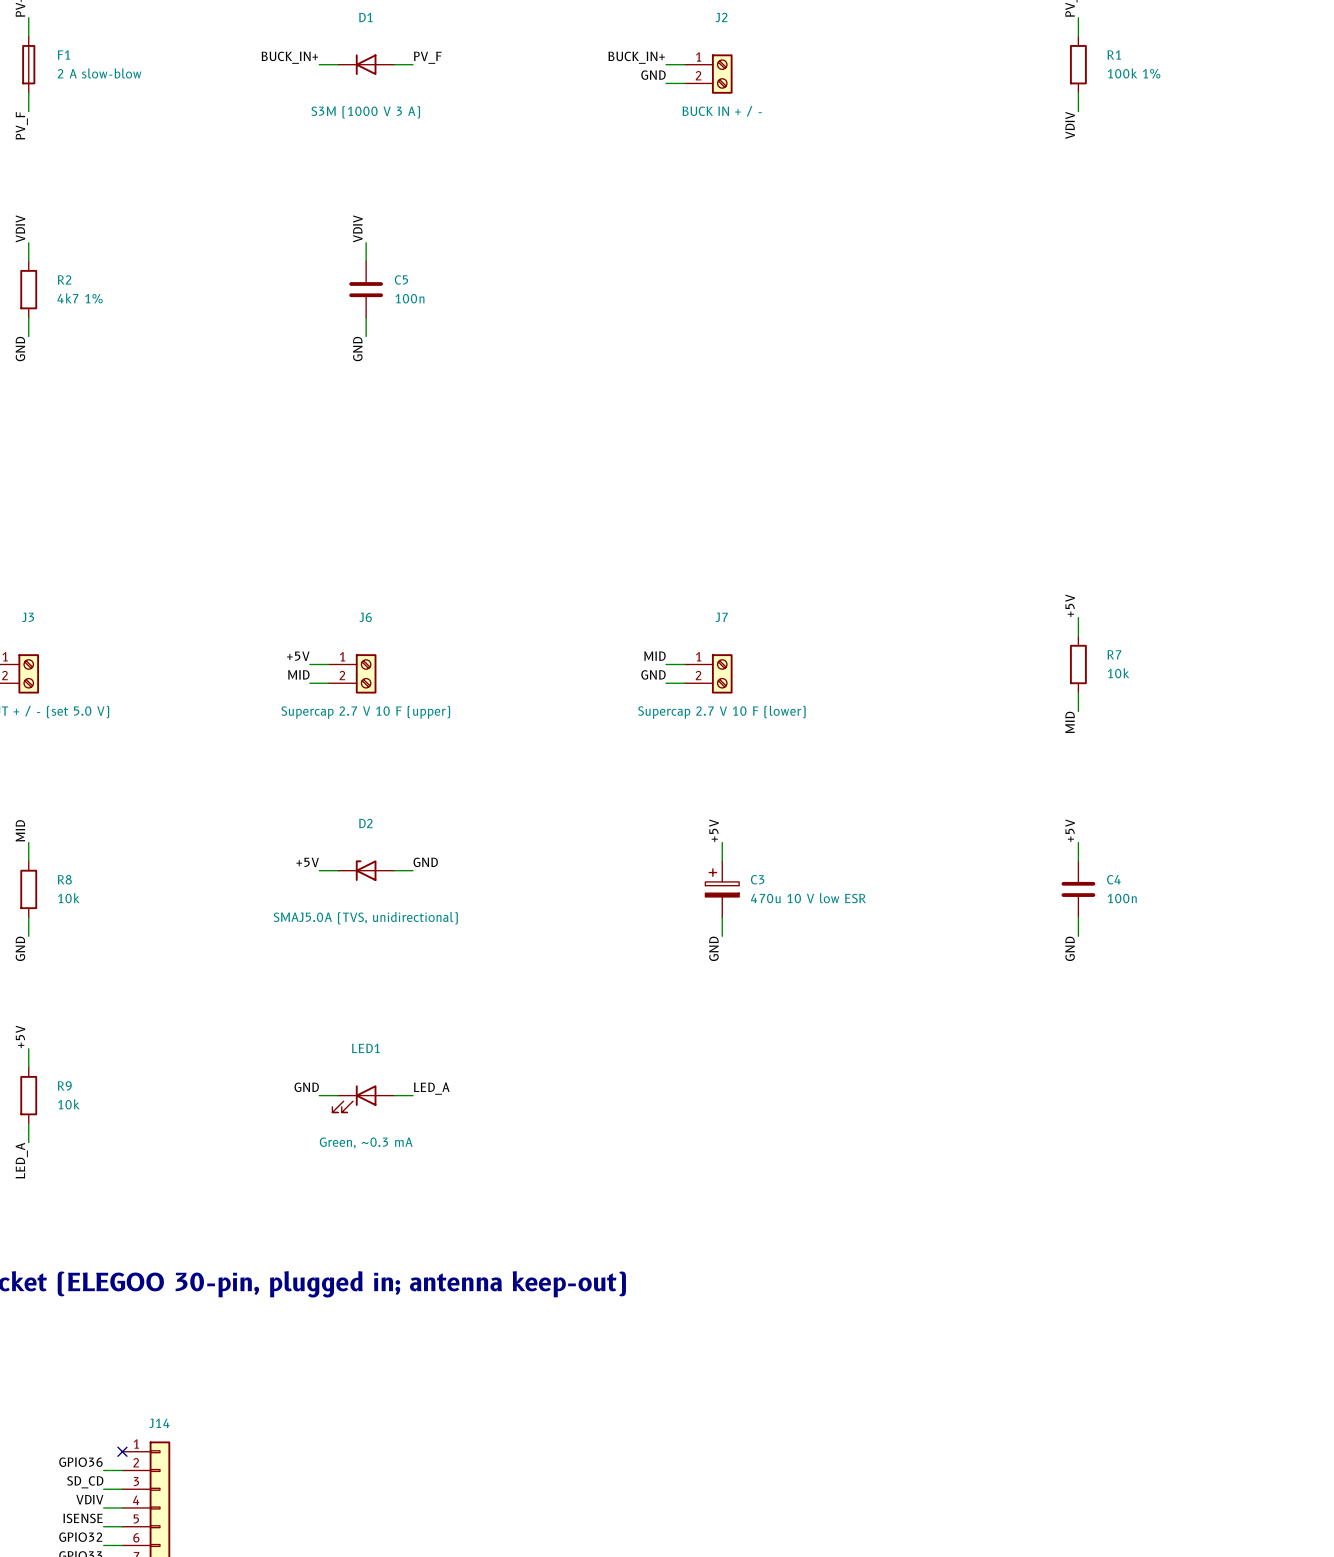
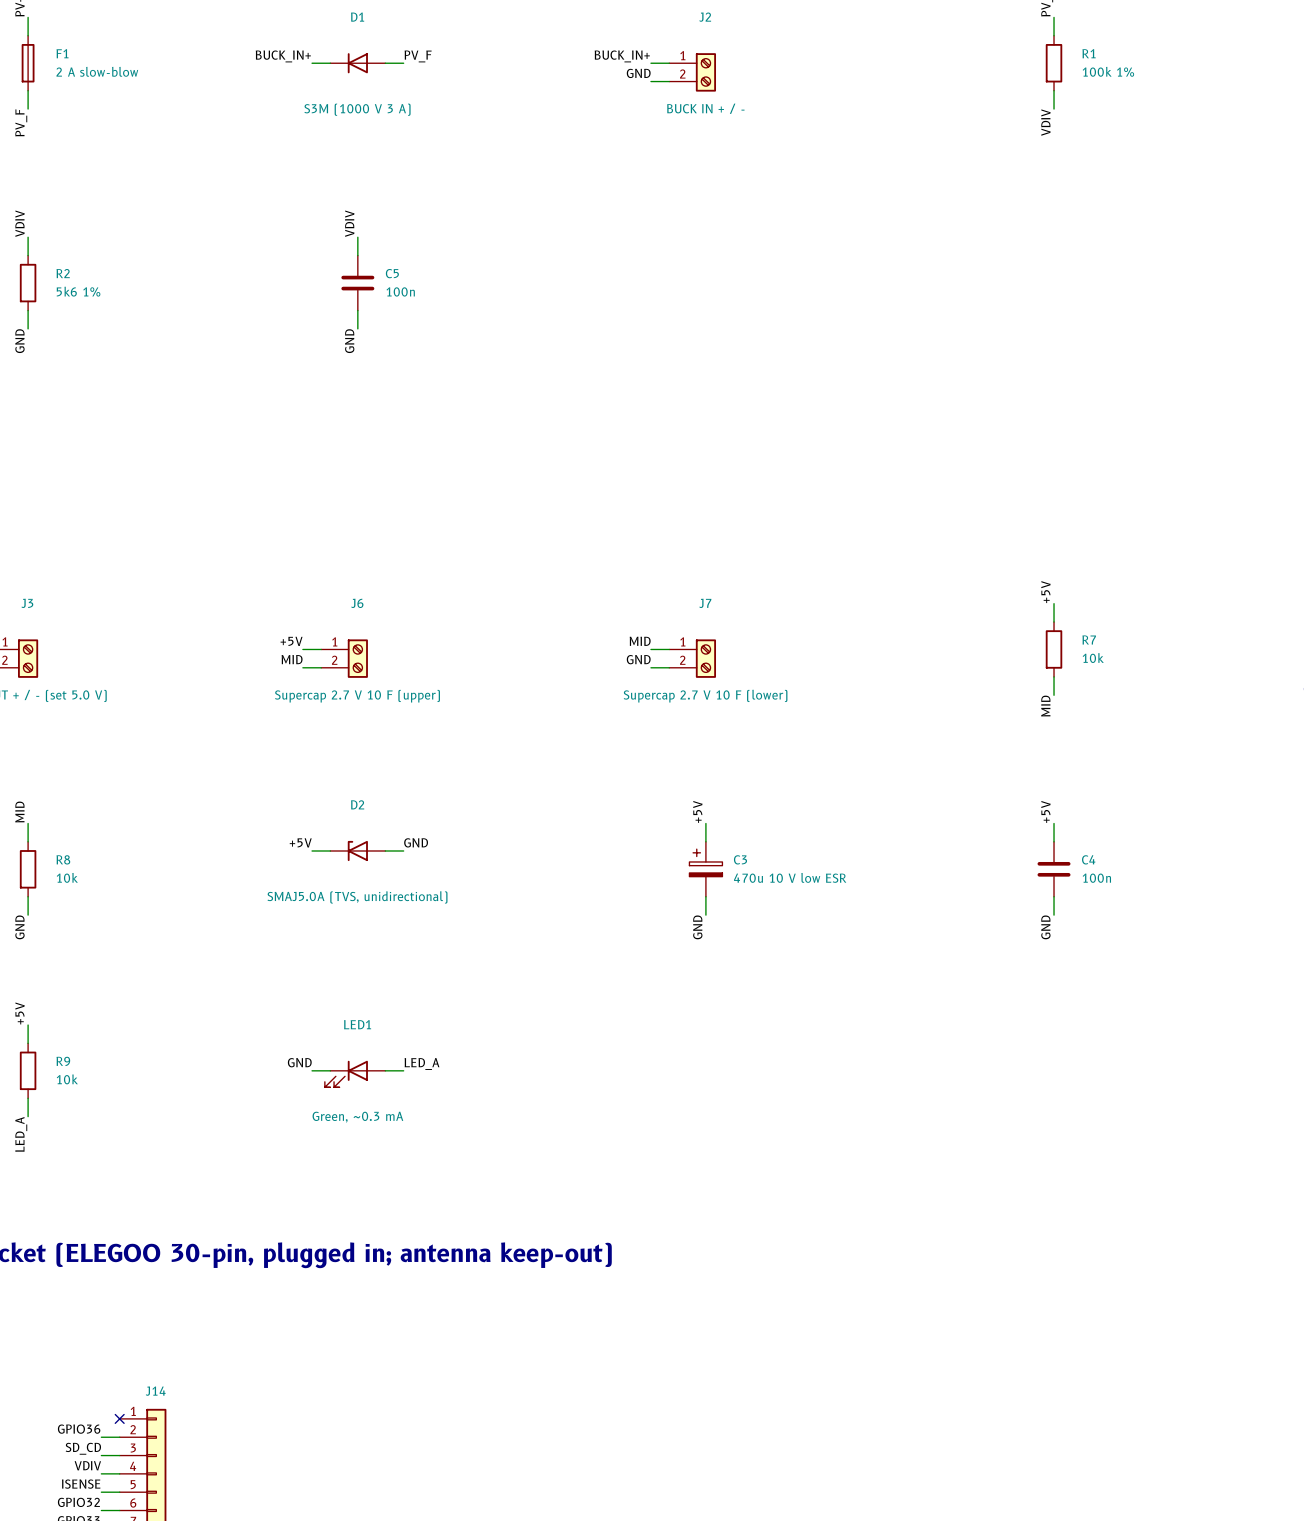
R2 value: 4k7 1% (80, 298) -> 5k6 1% (78, 291)

